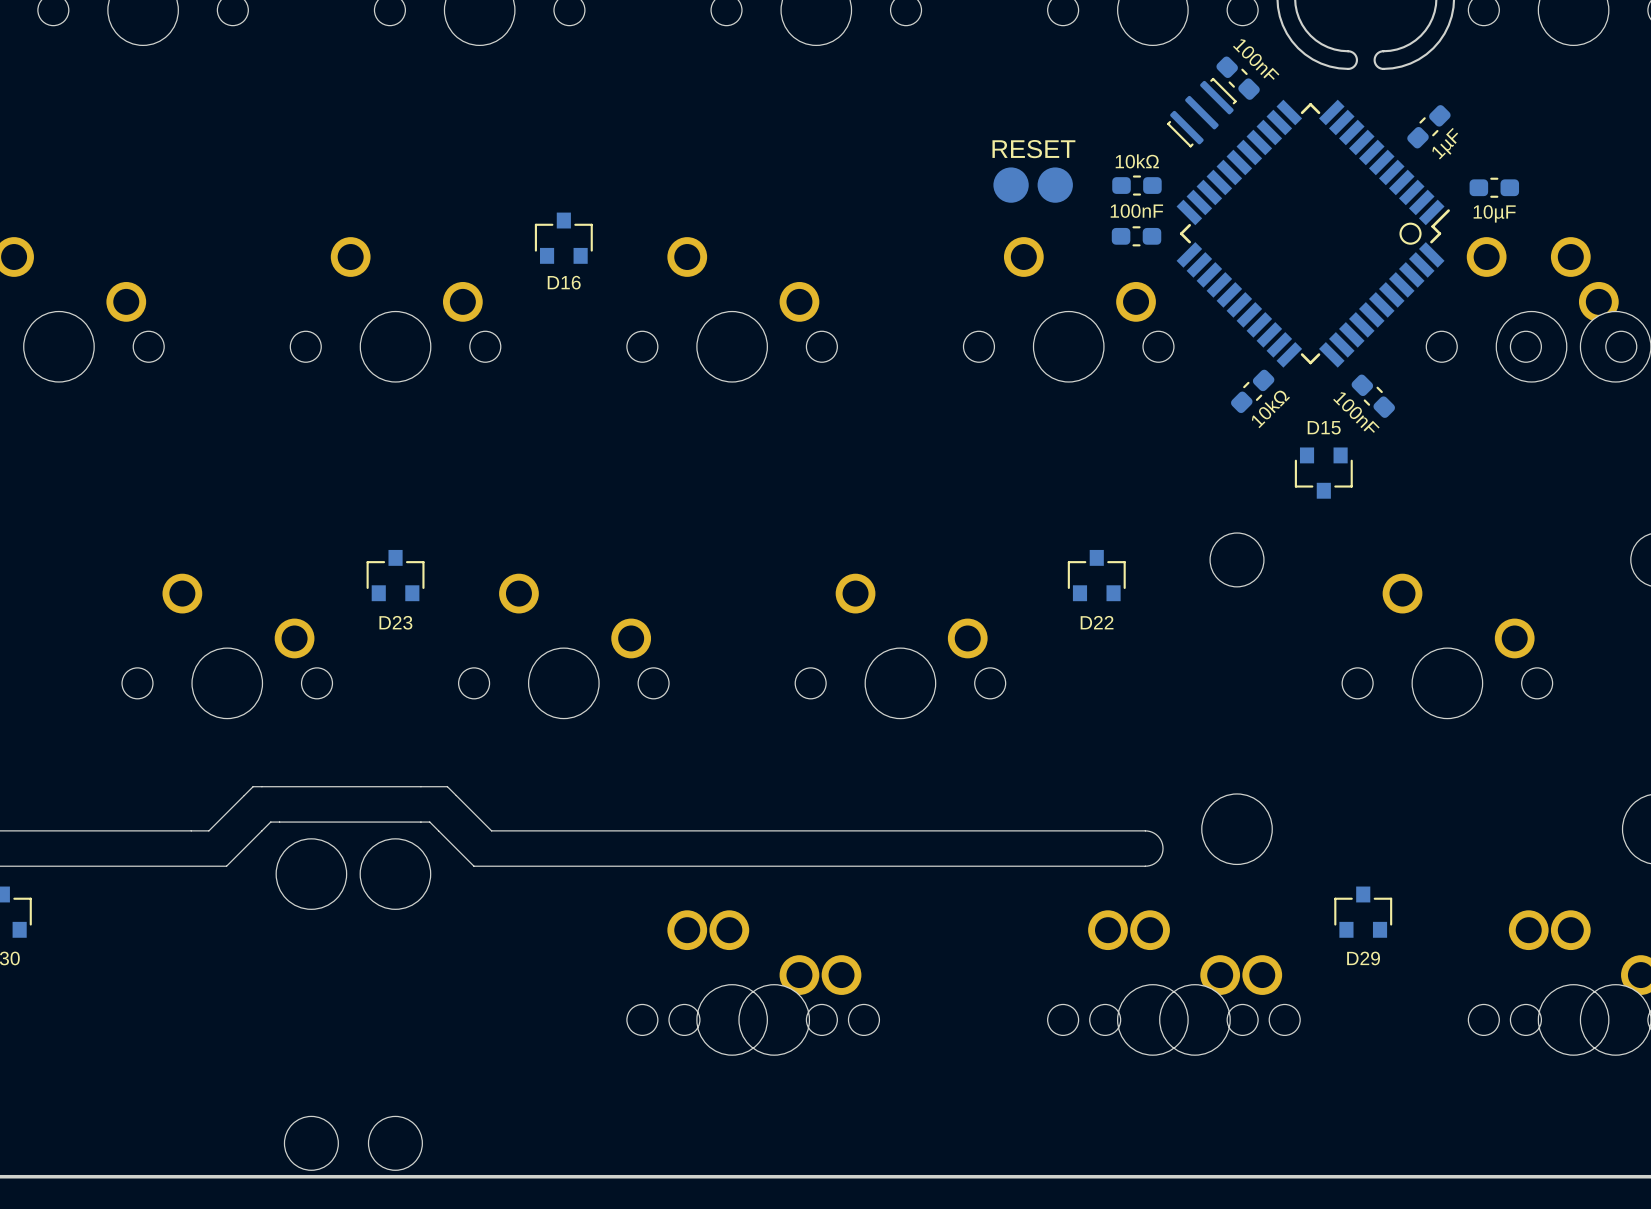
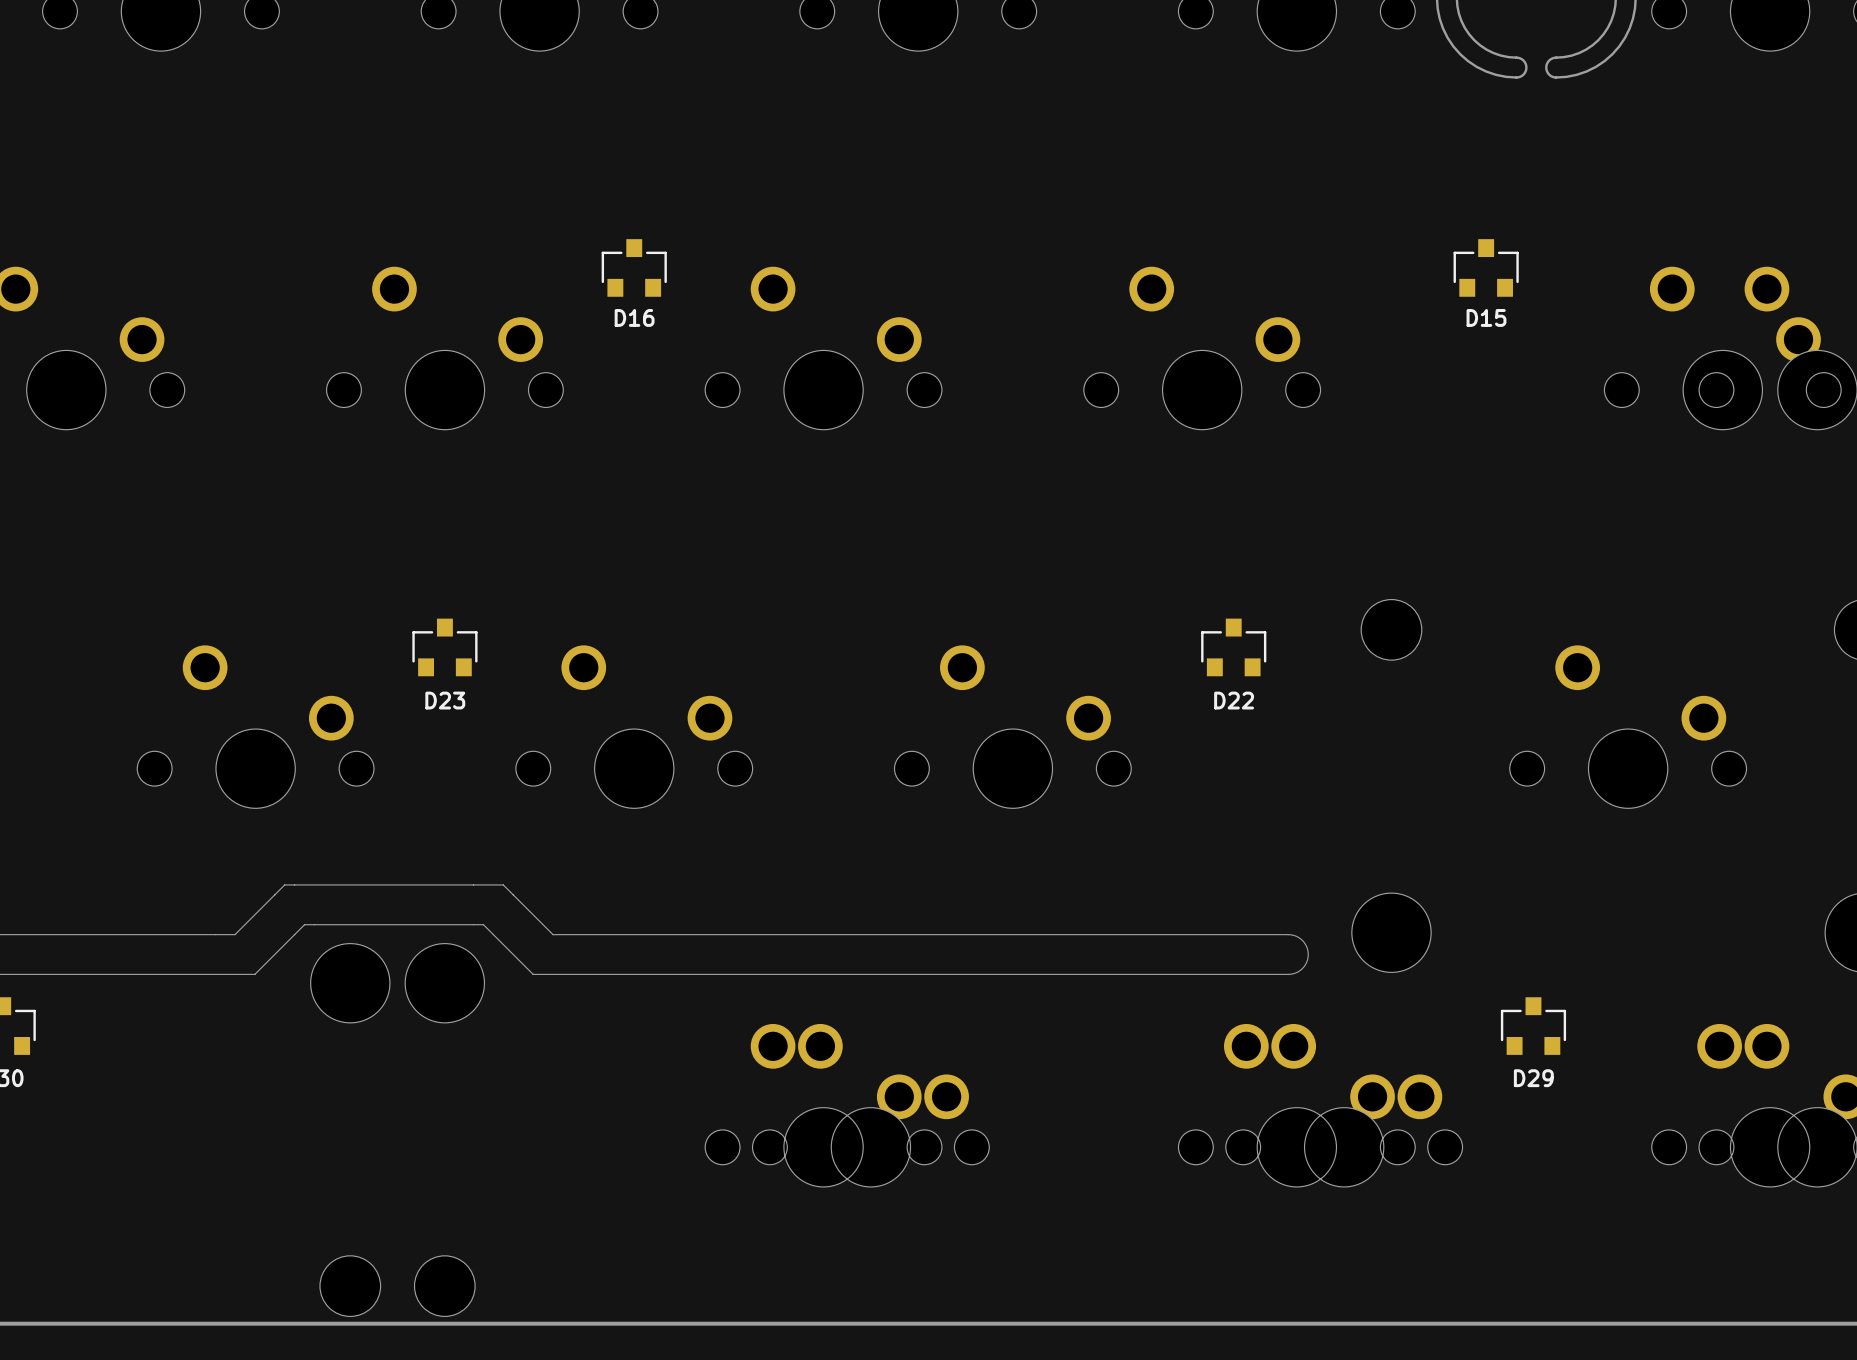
part: 100nF (1238, 78) -> none
part: (1201, 112) -> none
part: 1µF (1428, 126) -> none
part: RESET (1033, 185) -> none
part: 10kΩ (1136, 185) -> none
part: 10µF (1494, 187) -> none
part: (1313, 233) -> none
part: 100nF (1136, 236) -> none
part: 10kΩ (1252, 391) -> none
part: 100nF (1373, 396) -> none
D15 rotation: 0° (1323, 473) -> 180° (1486, 267)
D15 position: (1323, 473) -> (1486, 267)

